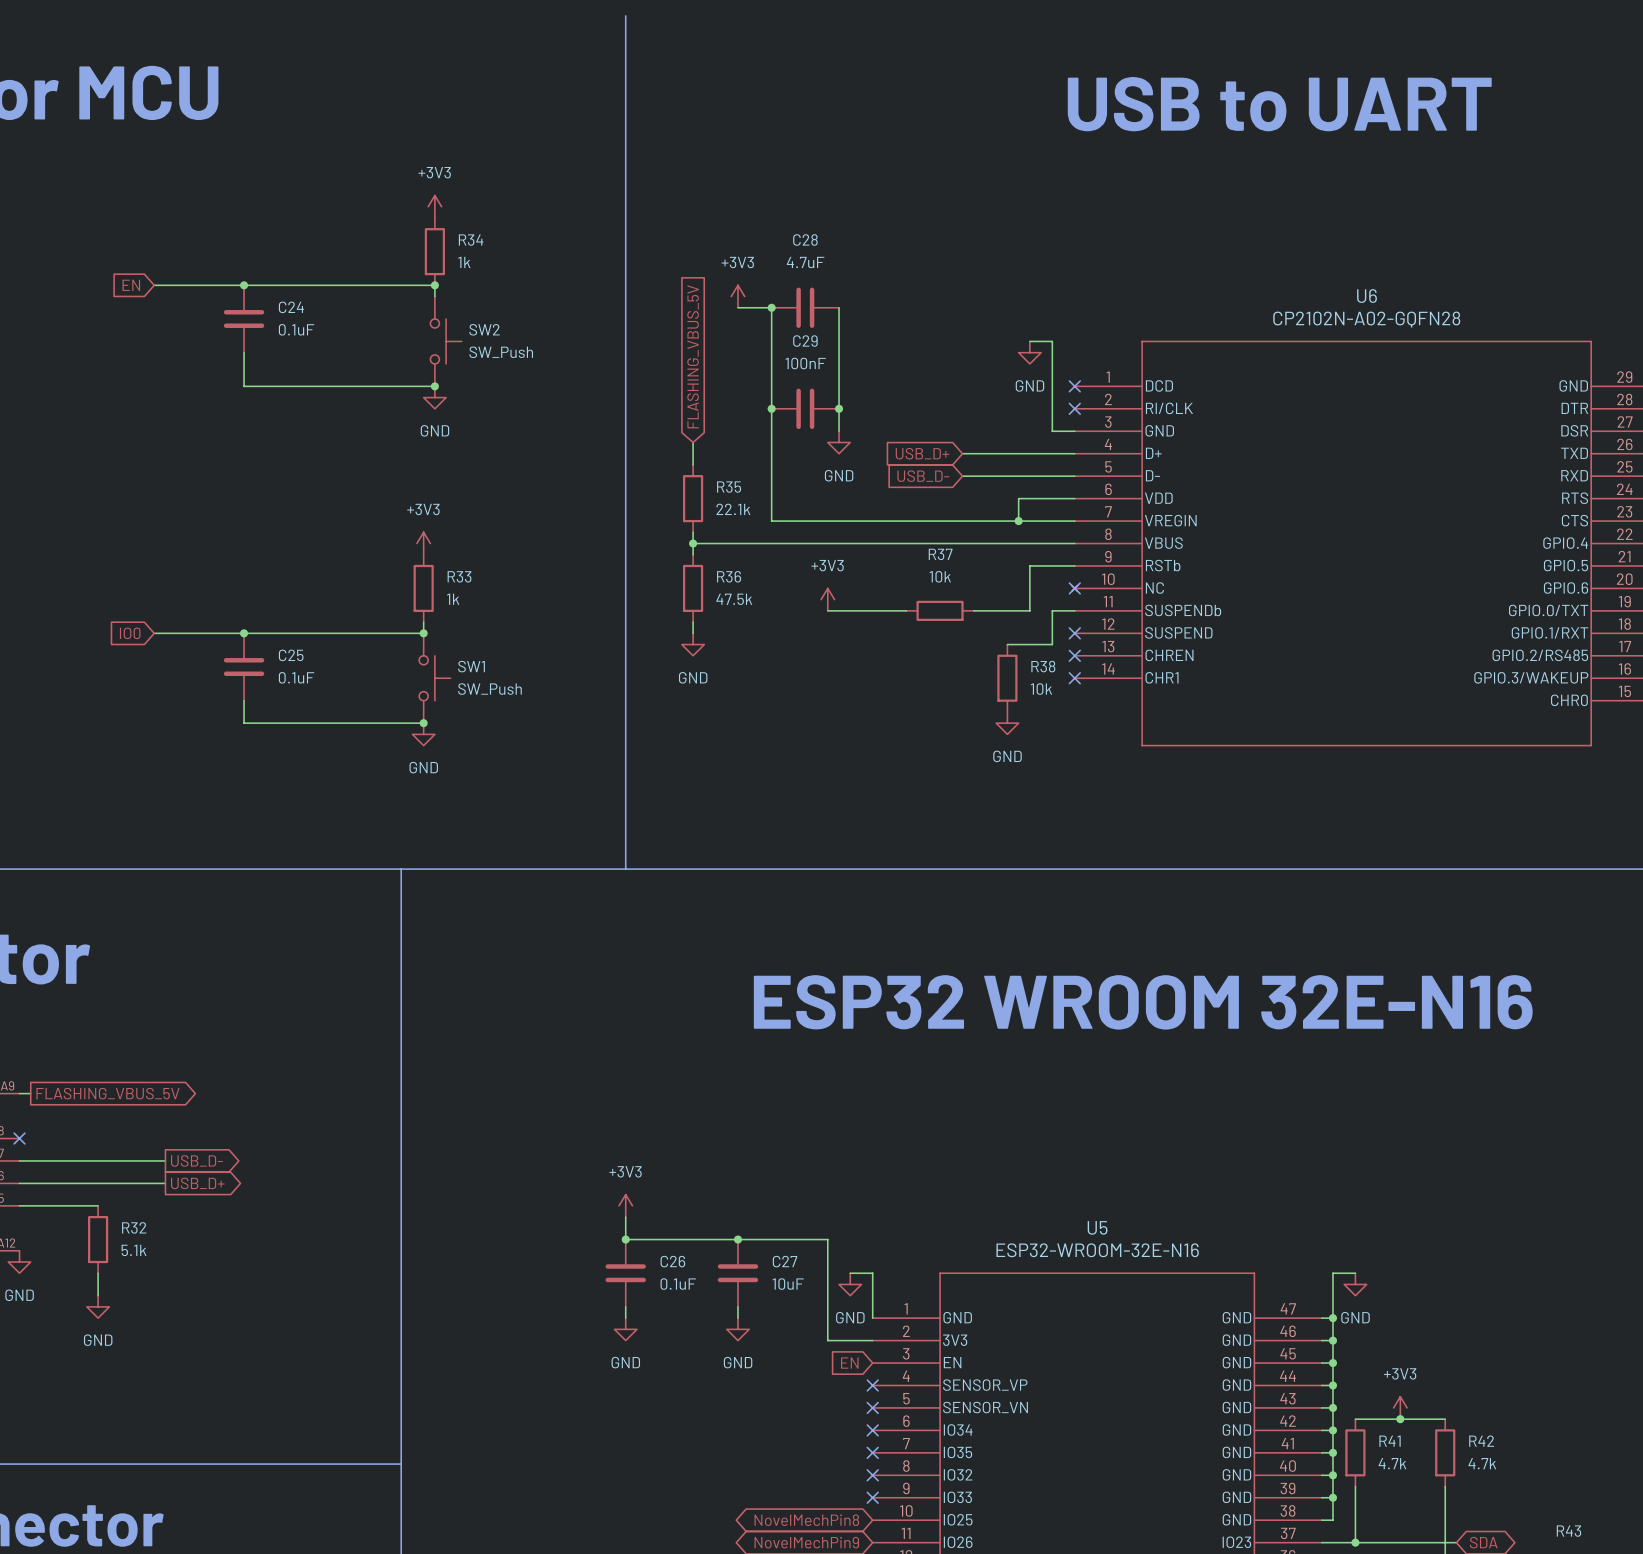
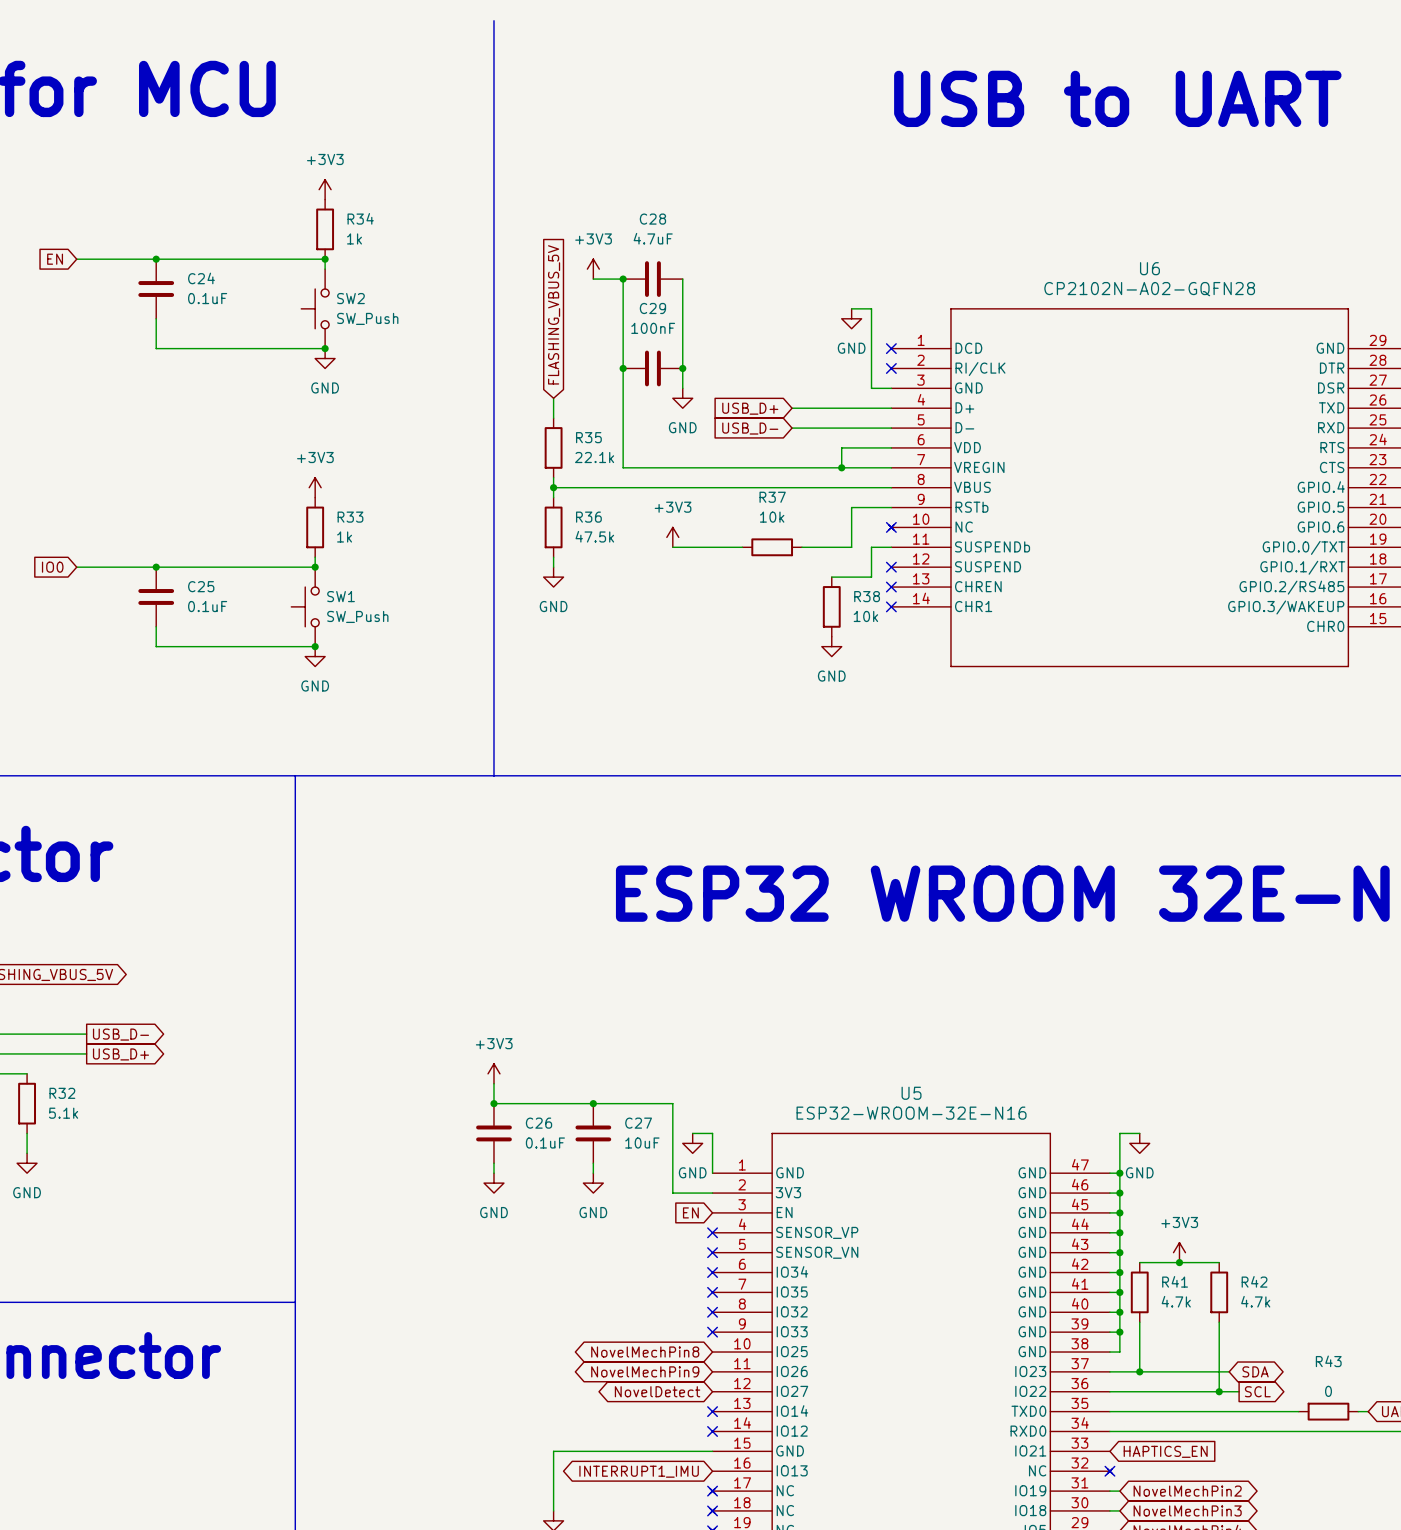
SW2 rotation: 0° (446, 341) -> 180° (315, 308)
SW1 rotation: 0° (434, 678) -> 180° (305, 606)

